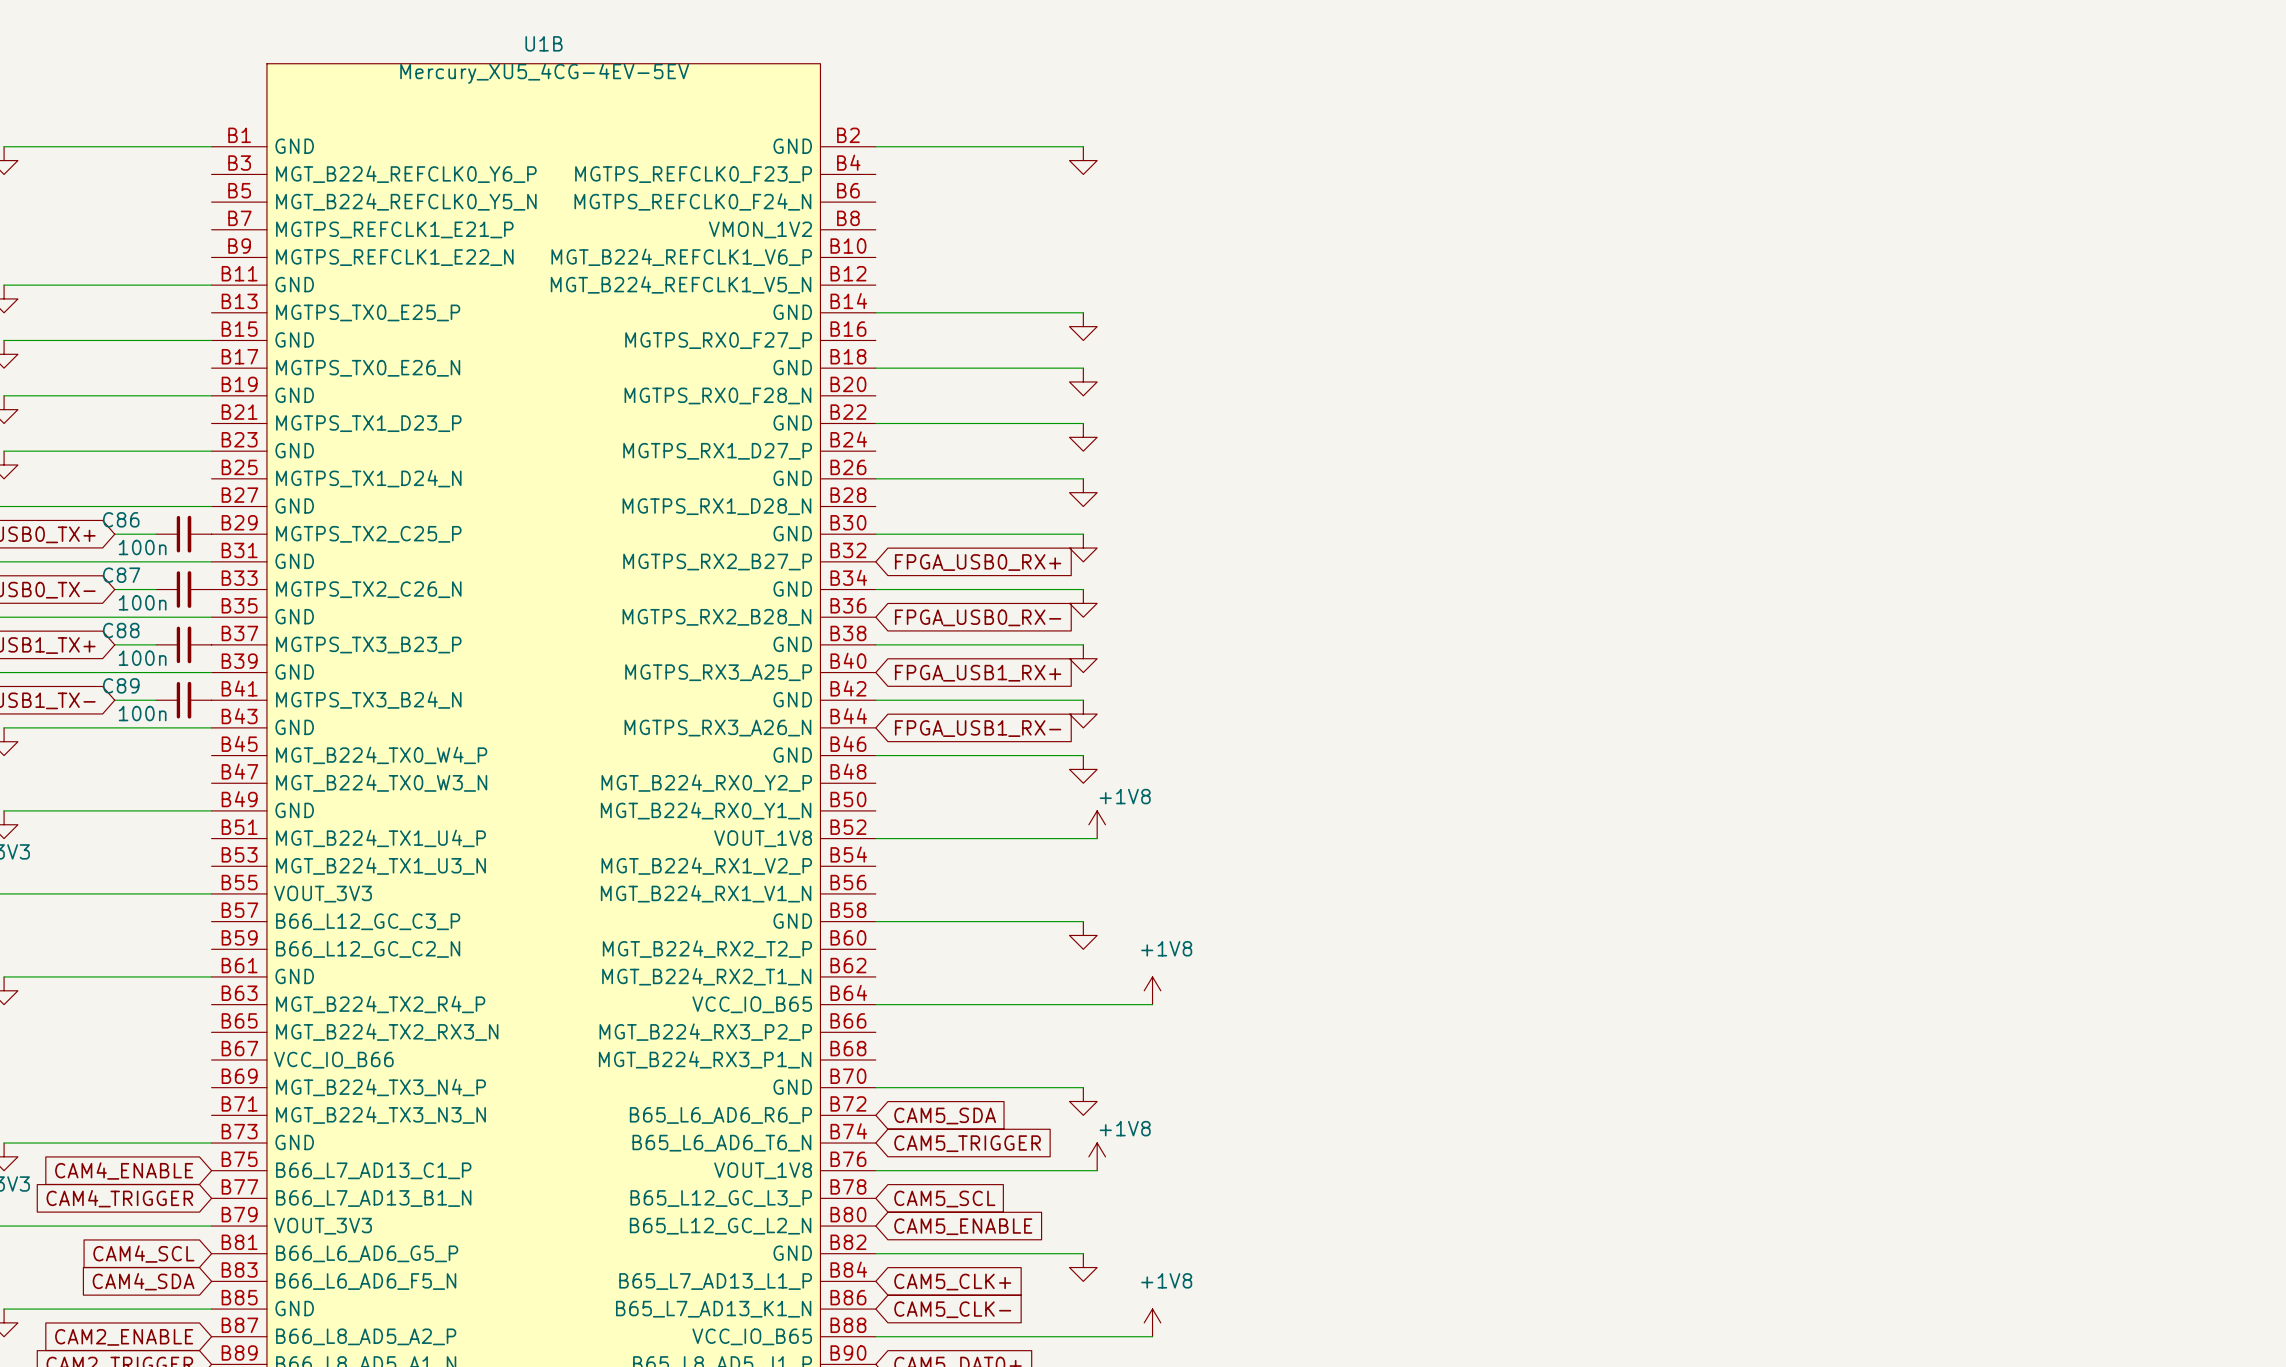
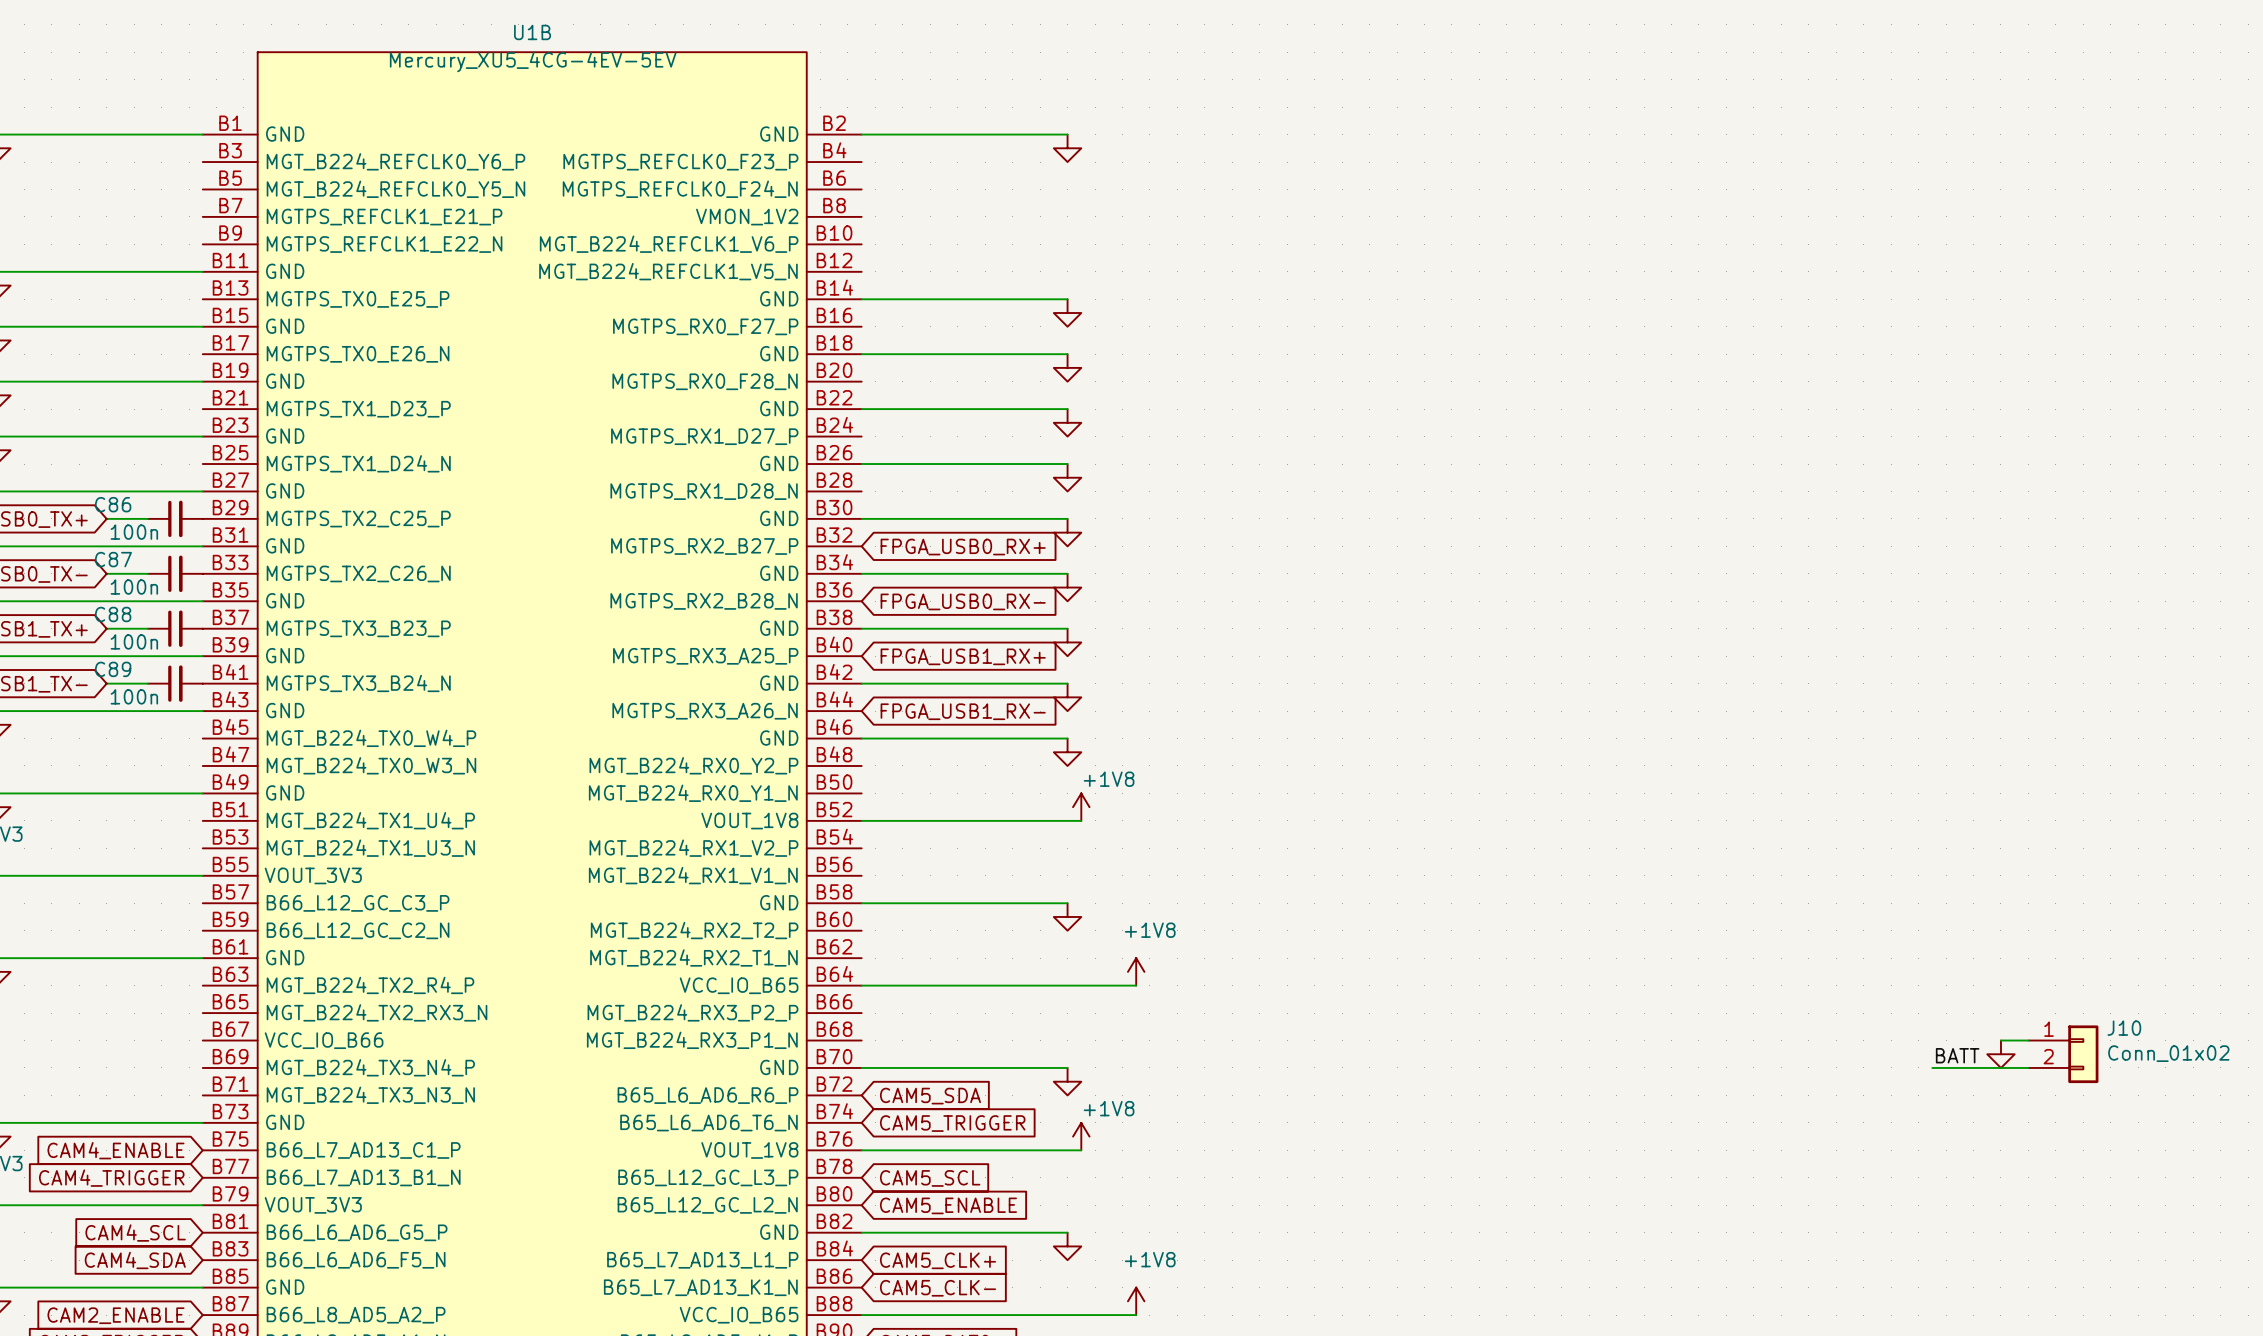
wire: none -> (2000, 1040) (2028, 1040)
power symbol: none -> (2000, 1054)
J10: none -> Conn_01x02 (2063, 1054)
label: none -> BATT (1957, 1055)
wire: none -> (1932, 1067) (2028, 1067)

